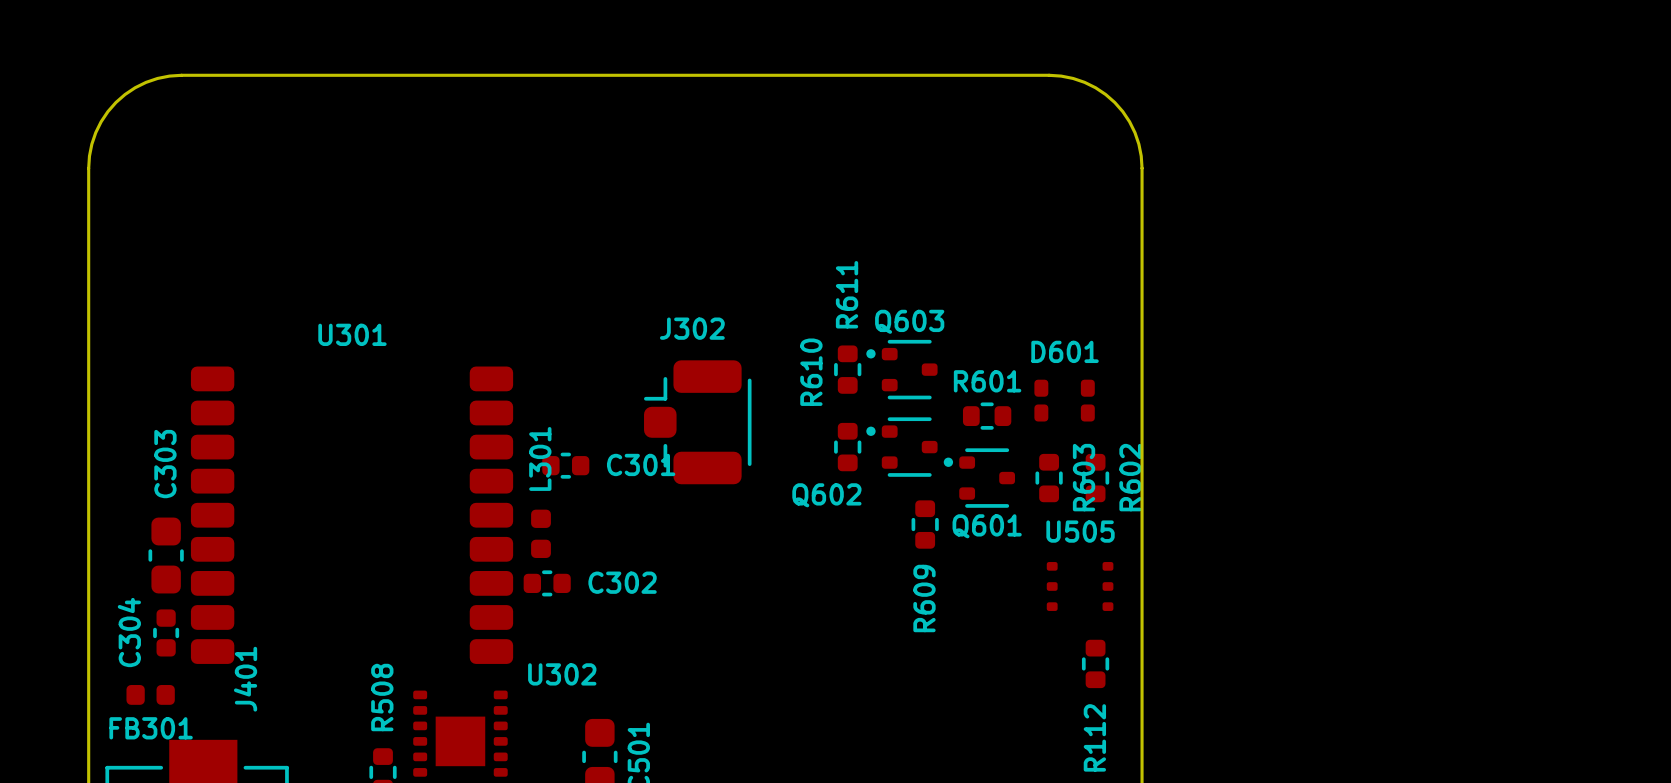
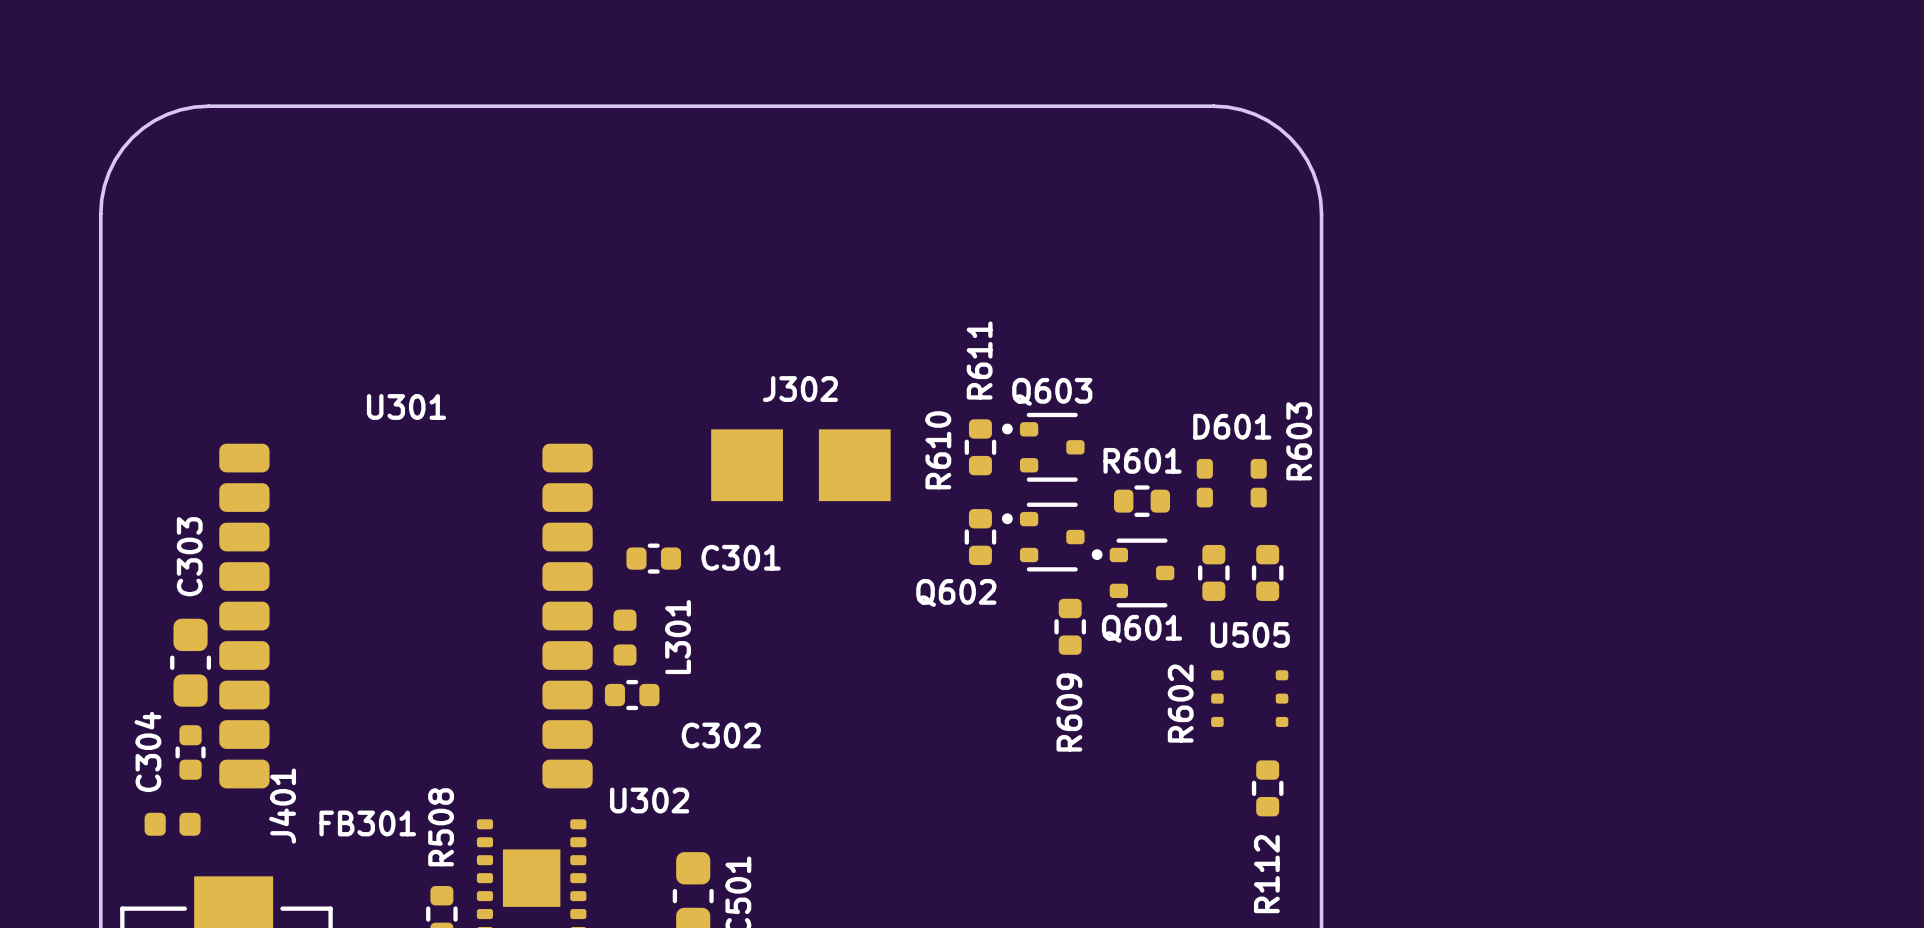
J302 footprint: [644, 360, 752, 485] -> [711, 429, 891, 502]
L301 name position: L301 (540, 458) -> L301 (678, 637)
R603 name position: R603 (1084, 477) -> R603 (1299, 441)
R602 name position: R602 (1130, 477) -> R602 (1180, 703)
C302 name position: C302 (622, 582) -> C302 (721, 735)
FB301 name position: FB301 (151, 728) -> FB301 (367, 823)

